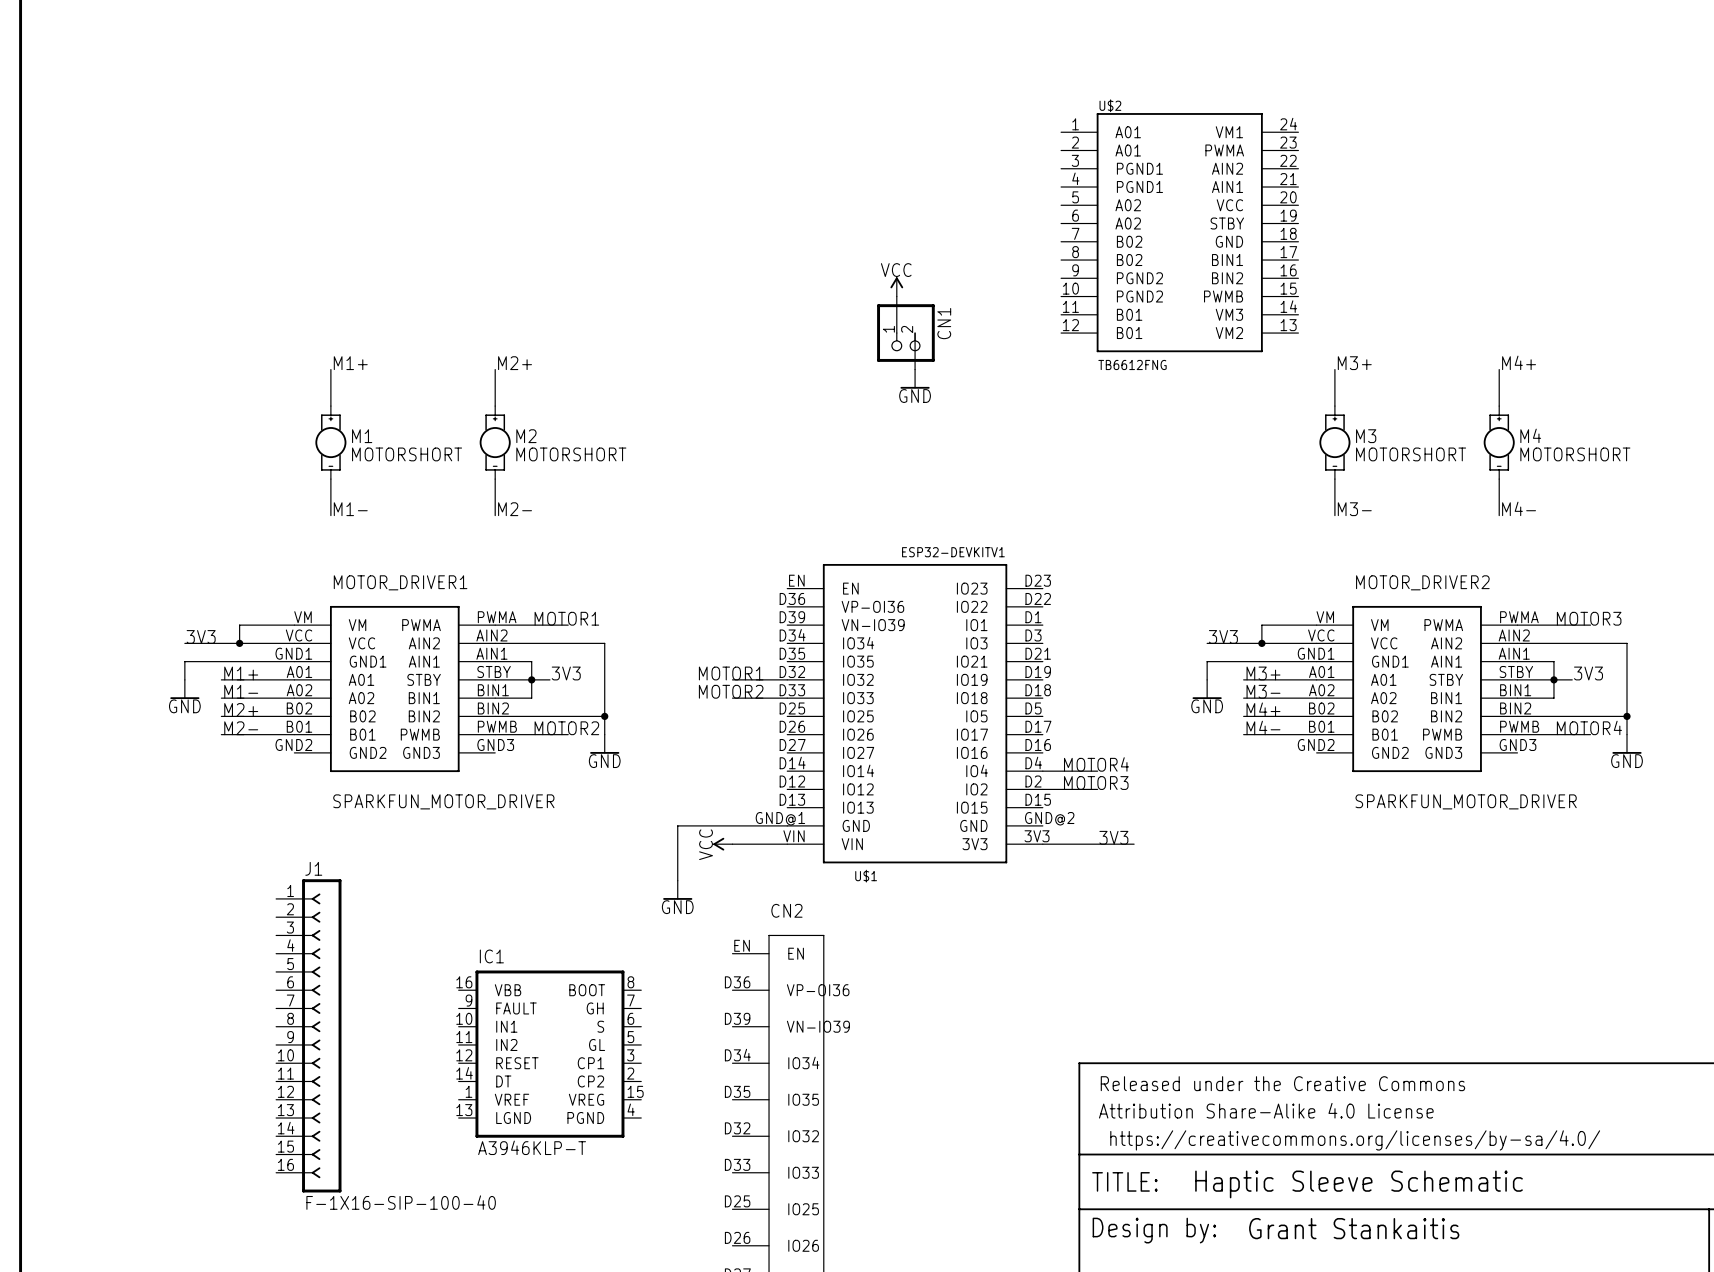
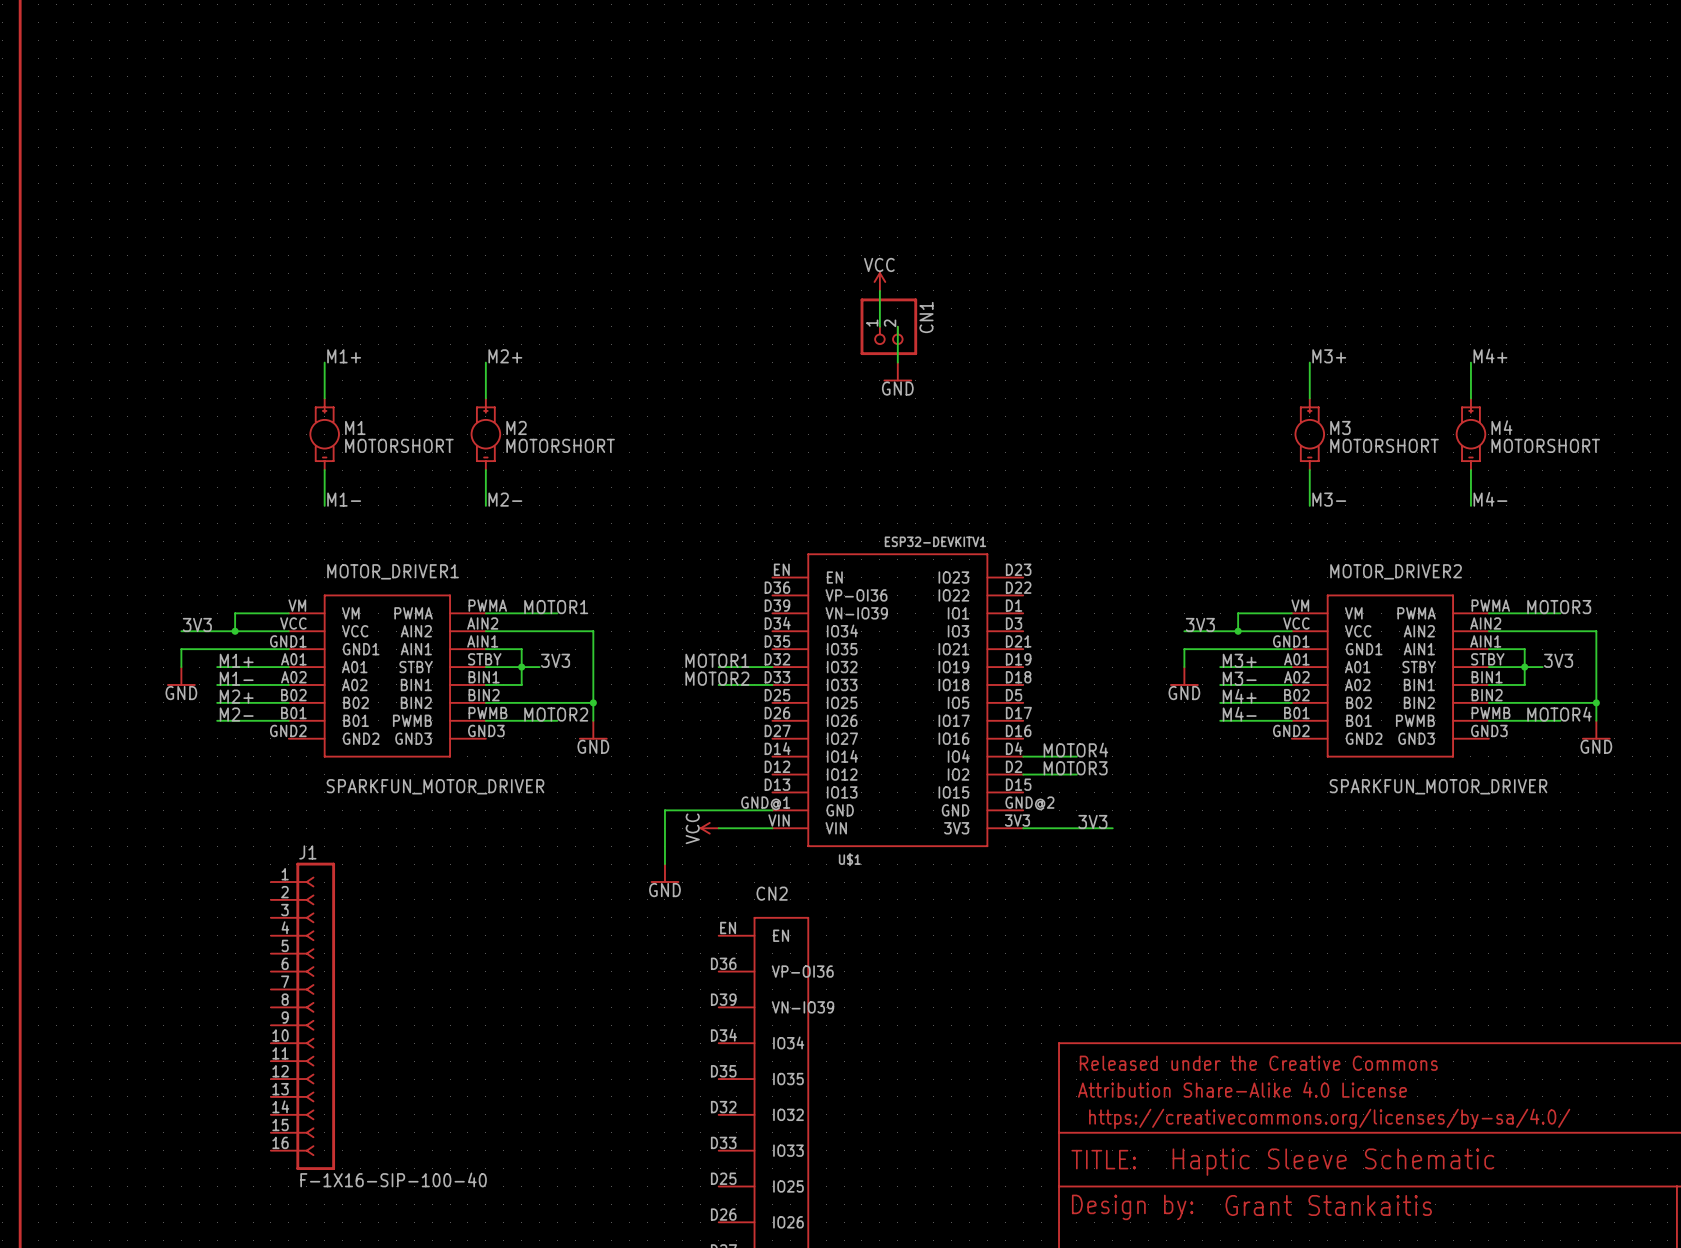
U$2: TB6612FNG (1179, 232) -> none
IC1: A3946KLP-T (549, 1054) -> none

